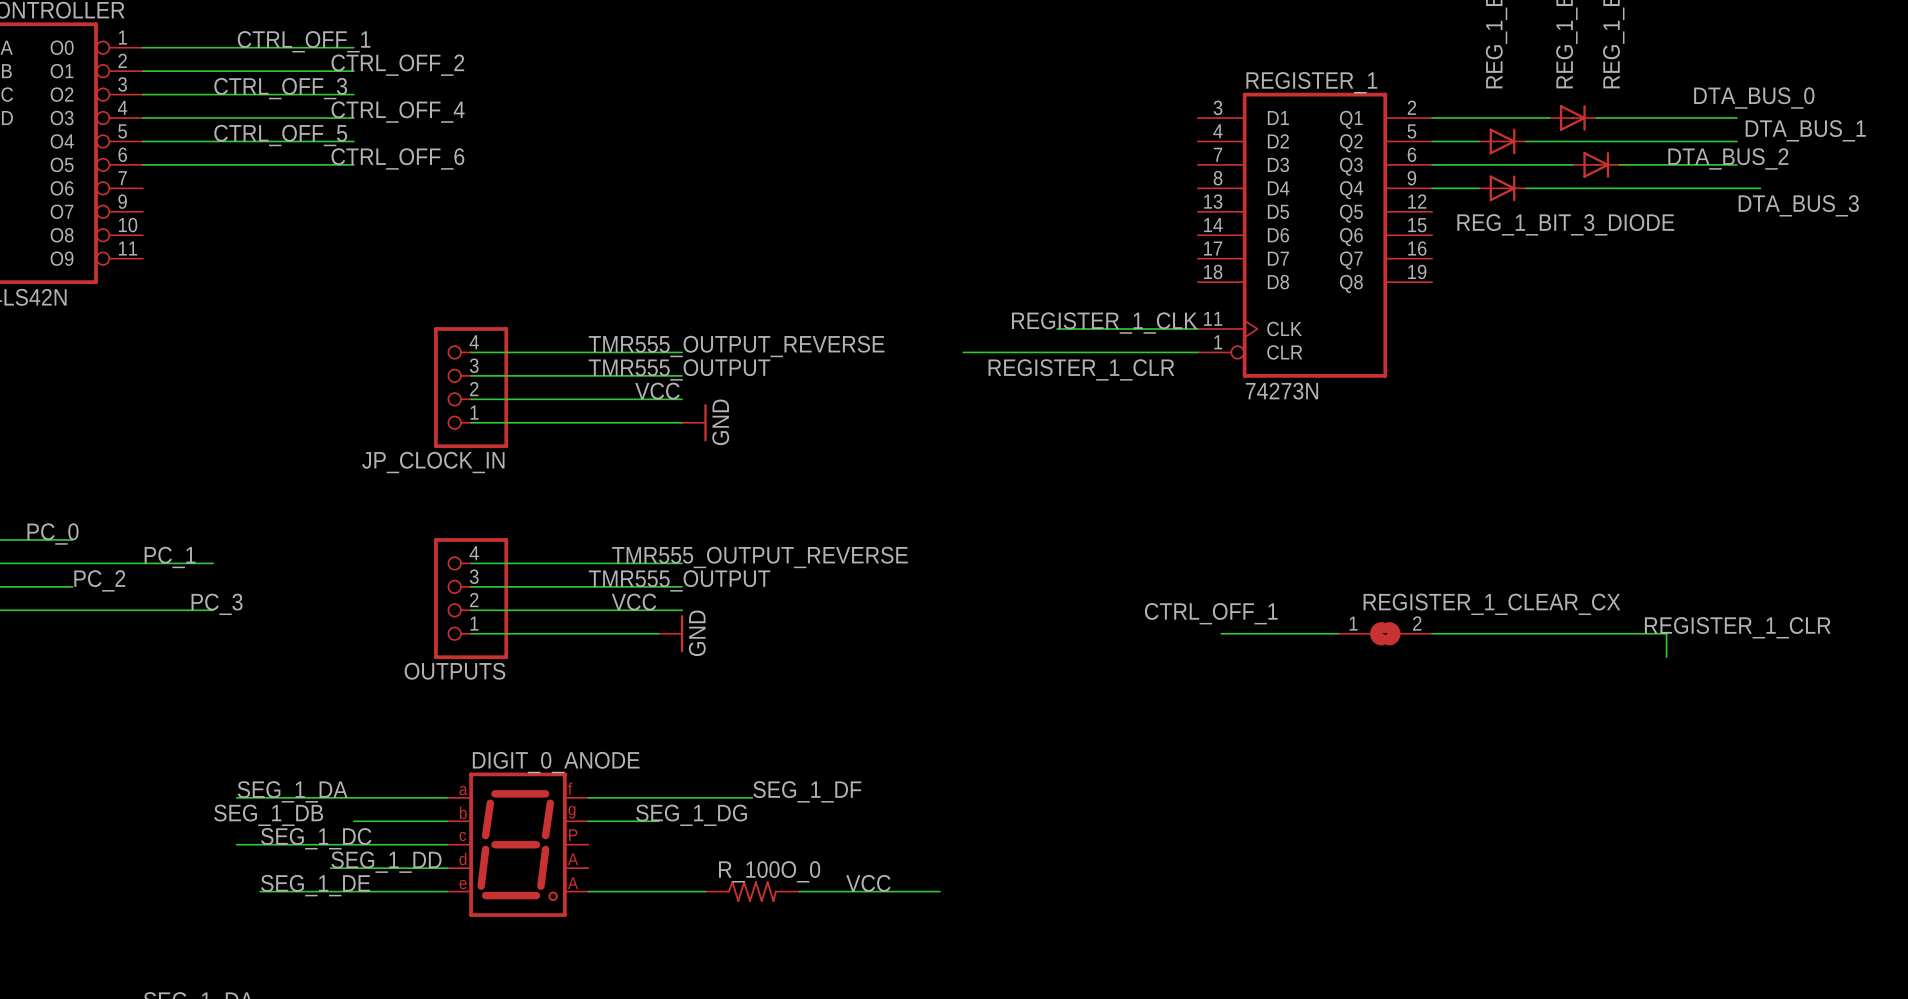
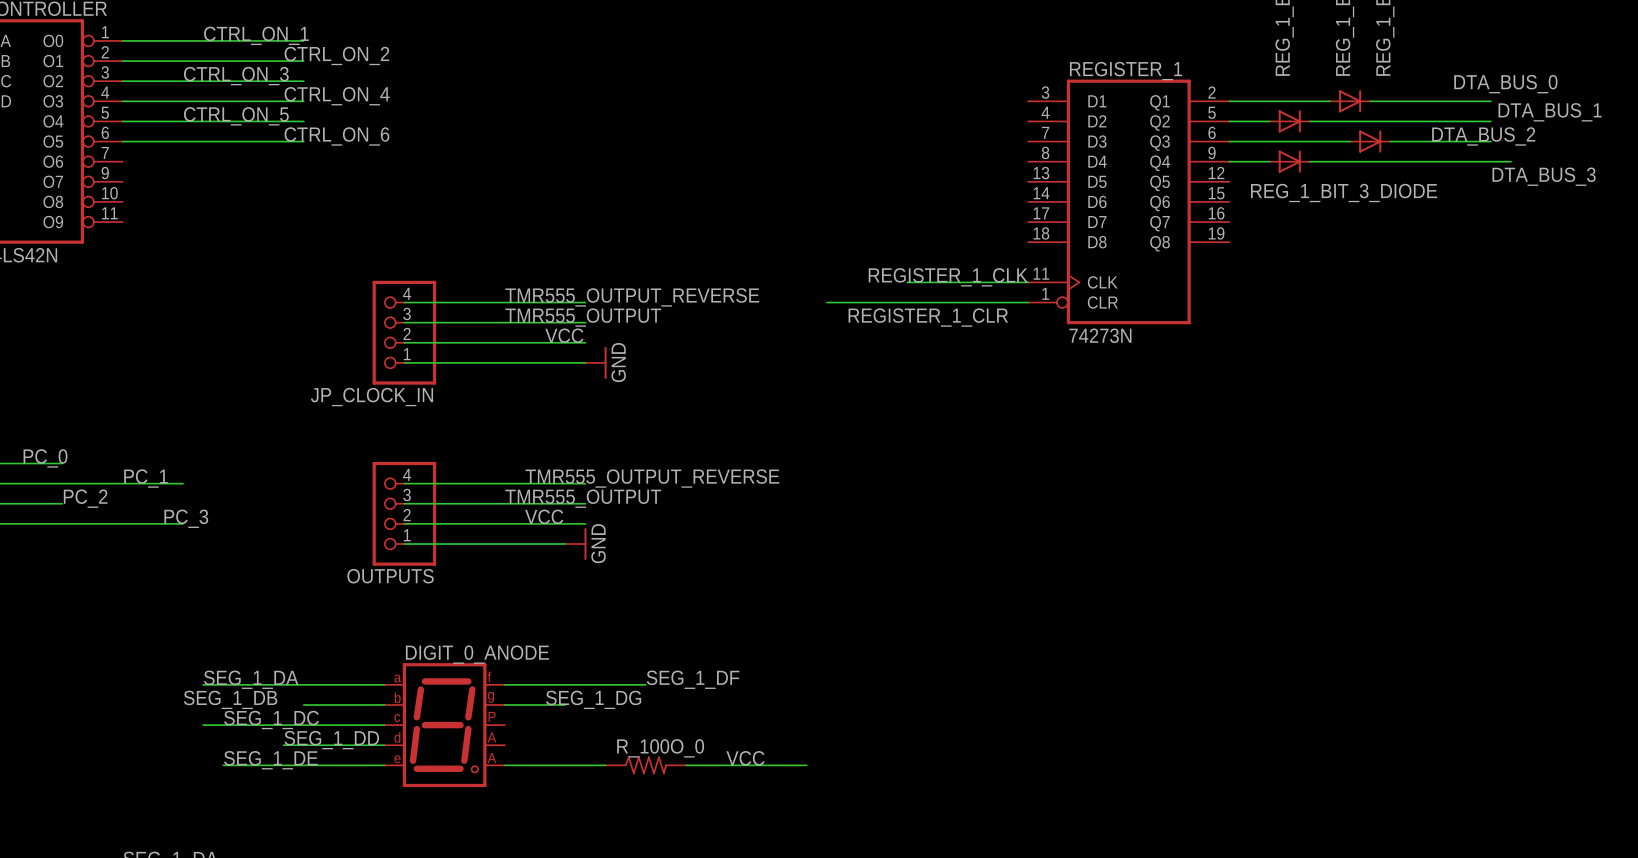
label: CTRL_OFF_1 (304, 41) -> CTRL_ON_1 (256, 35)
label: CTRL_OFF_2 (397, 65) -> CTRL_ON_2 (336, 55)
label: CTRL_OFF_3 (280, 88) -> CTRL_ON_3 (236, 76)
label: CTRL_OFF_4 (398, 112) -> CTRL_ON_4 (337, 96)
label: CTRL_OFF_5 (280, 135) -> CTRL_ON_5 (236, 116)
label: CTRL_OFF_6 (397, 158) -> CTRL_ON_6 (336, 136)
label: CTRL_OFF_1 (1211, 613) -> none
label: REGISTER_1_CLR (1737, 627) -> none
wire: (1221, 633) (1338, 633) -> none
REGISTER_1_CLEAR_CX: (1385, 633) -> none
wire: (1432, 633) (1666, 633) (1666, 657) -> none

